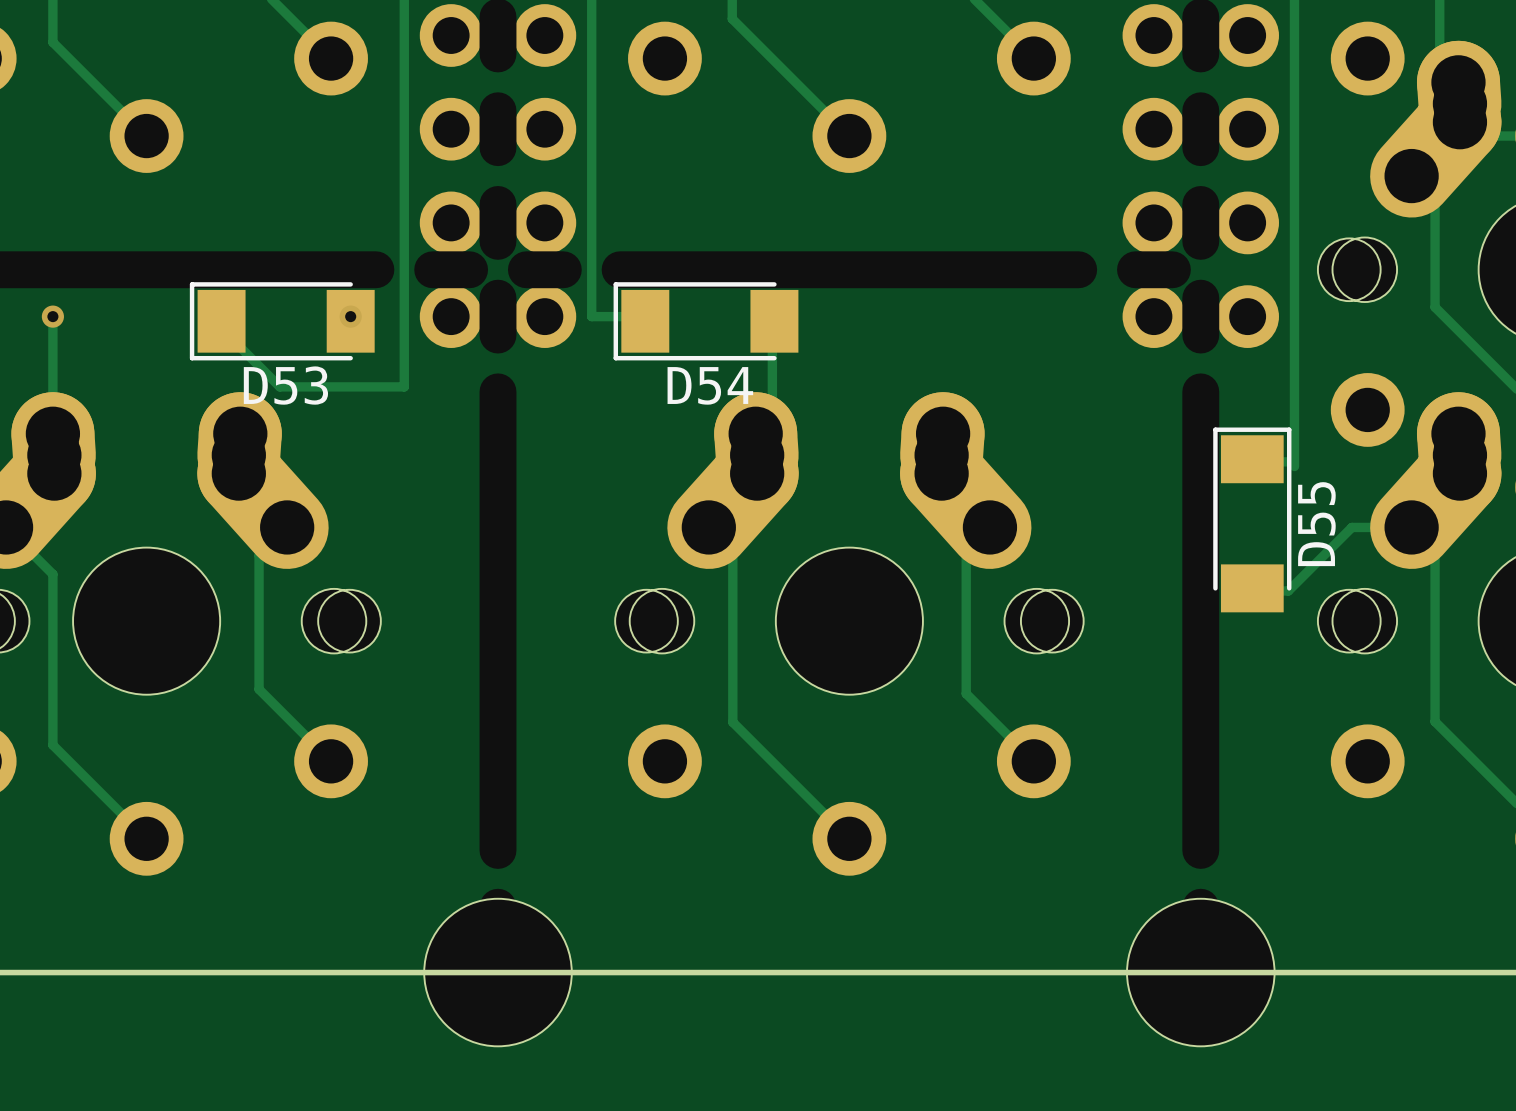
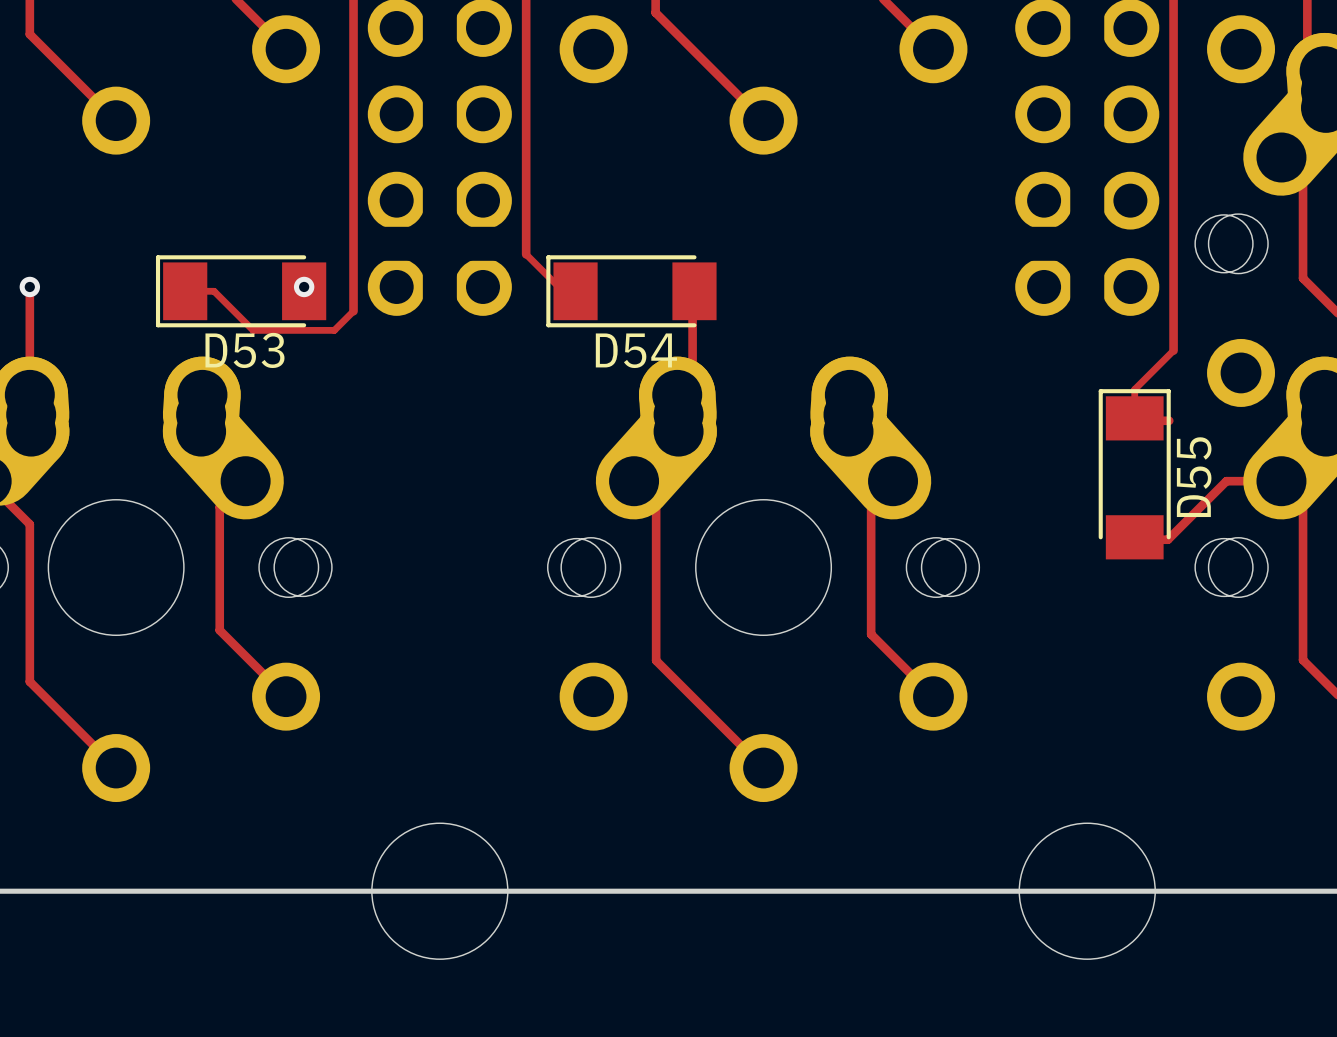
track: (591, 281) (591, 316) (643, 316) -> (526, 254) (563, 291) (575, 291)
track: (228, 335) (279, 386) (404, 386) (404, 342) -> (185, 291) (214, 291) (253, 330) (334, 330) (353, 311)
track: (1294, 385) (1294, 466) -> (1173, 350) (1134, 389) (1134, 418)

